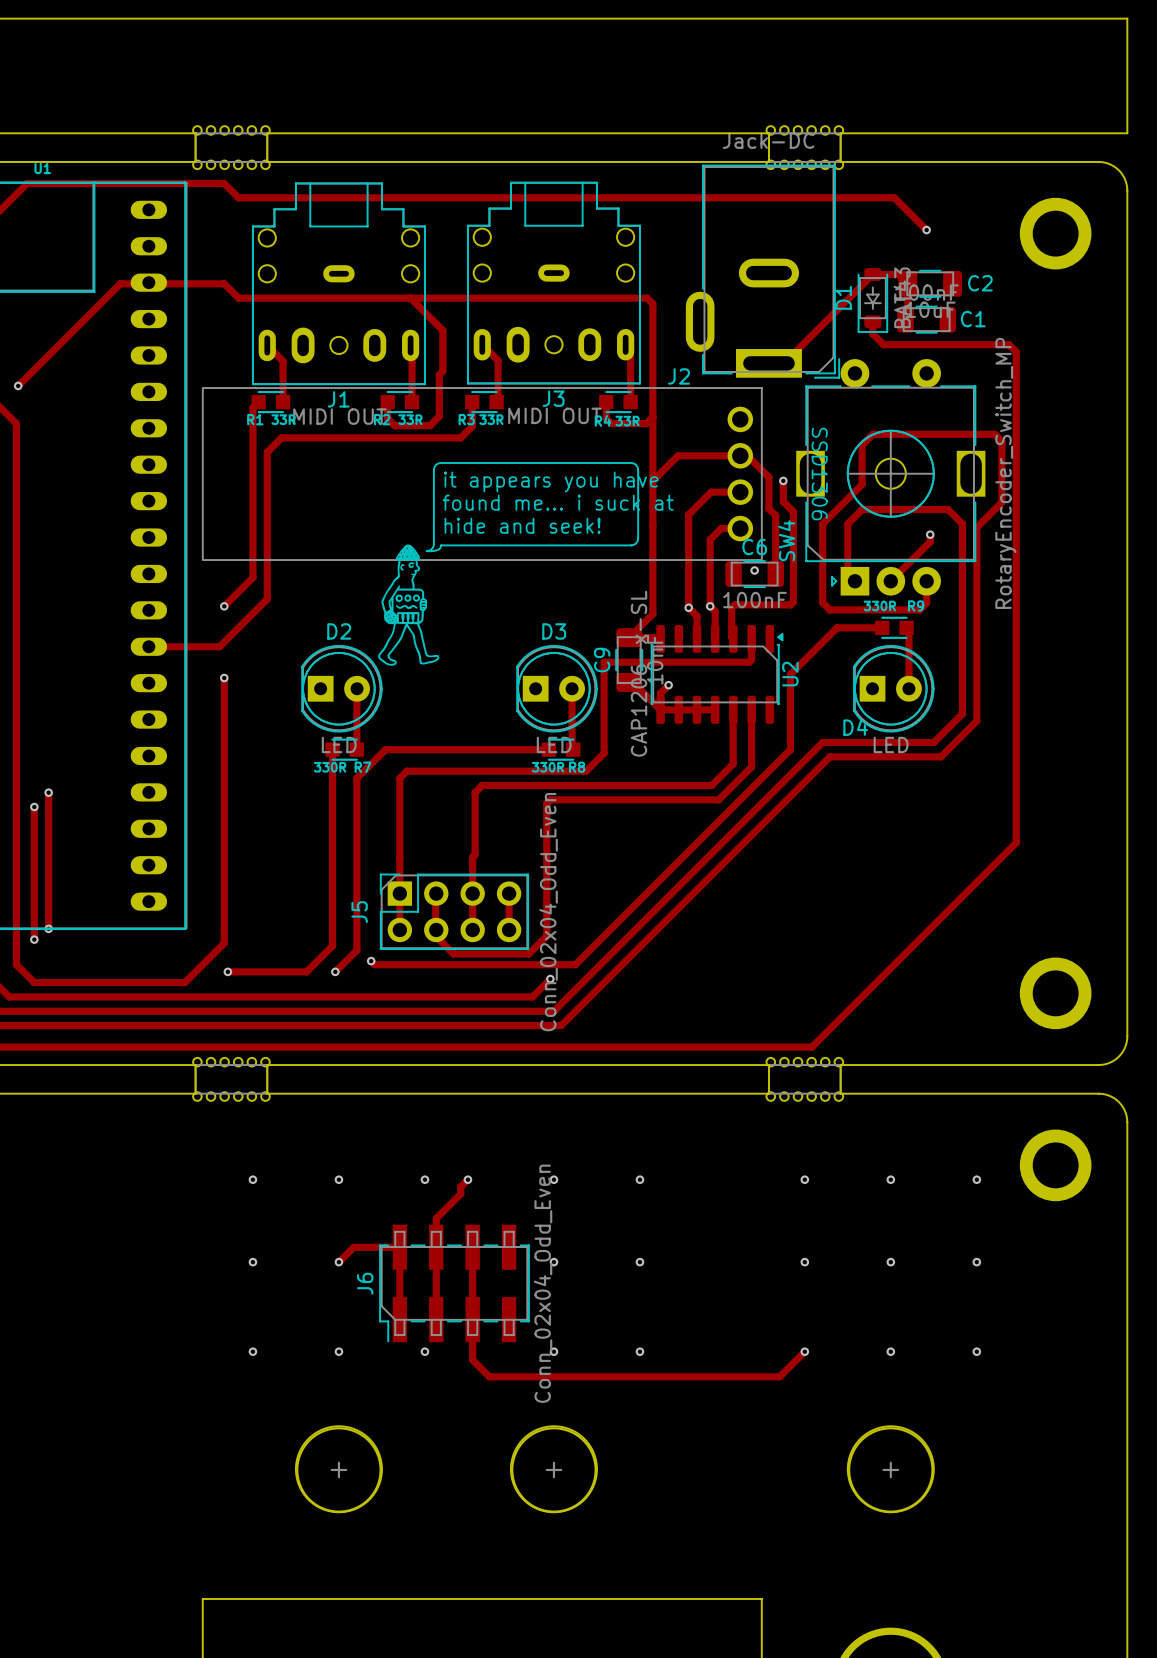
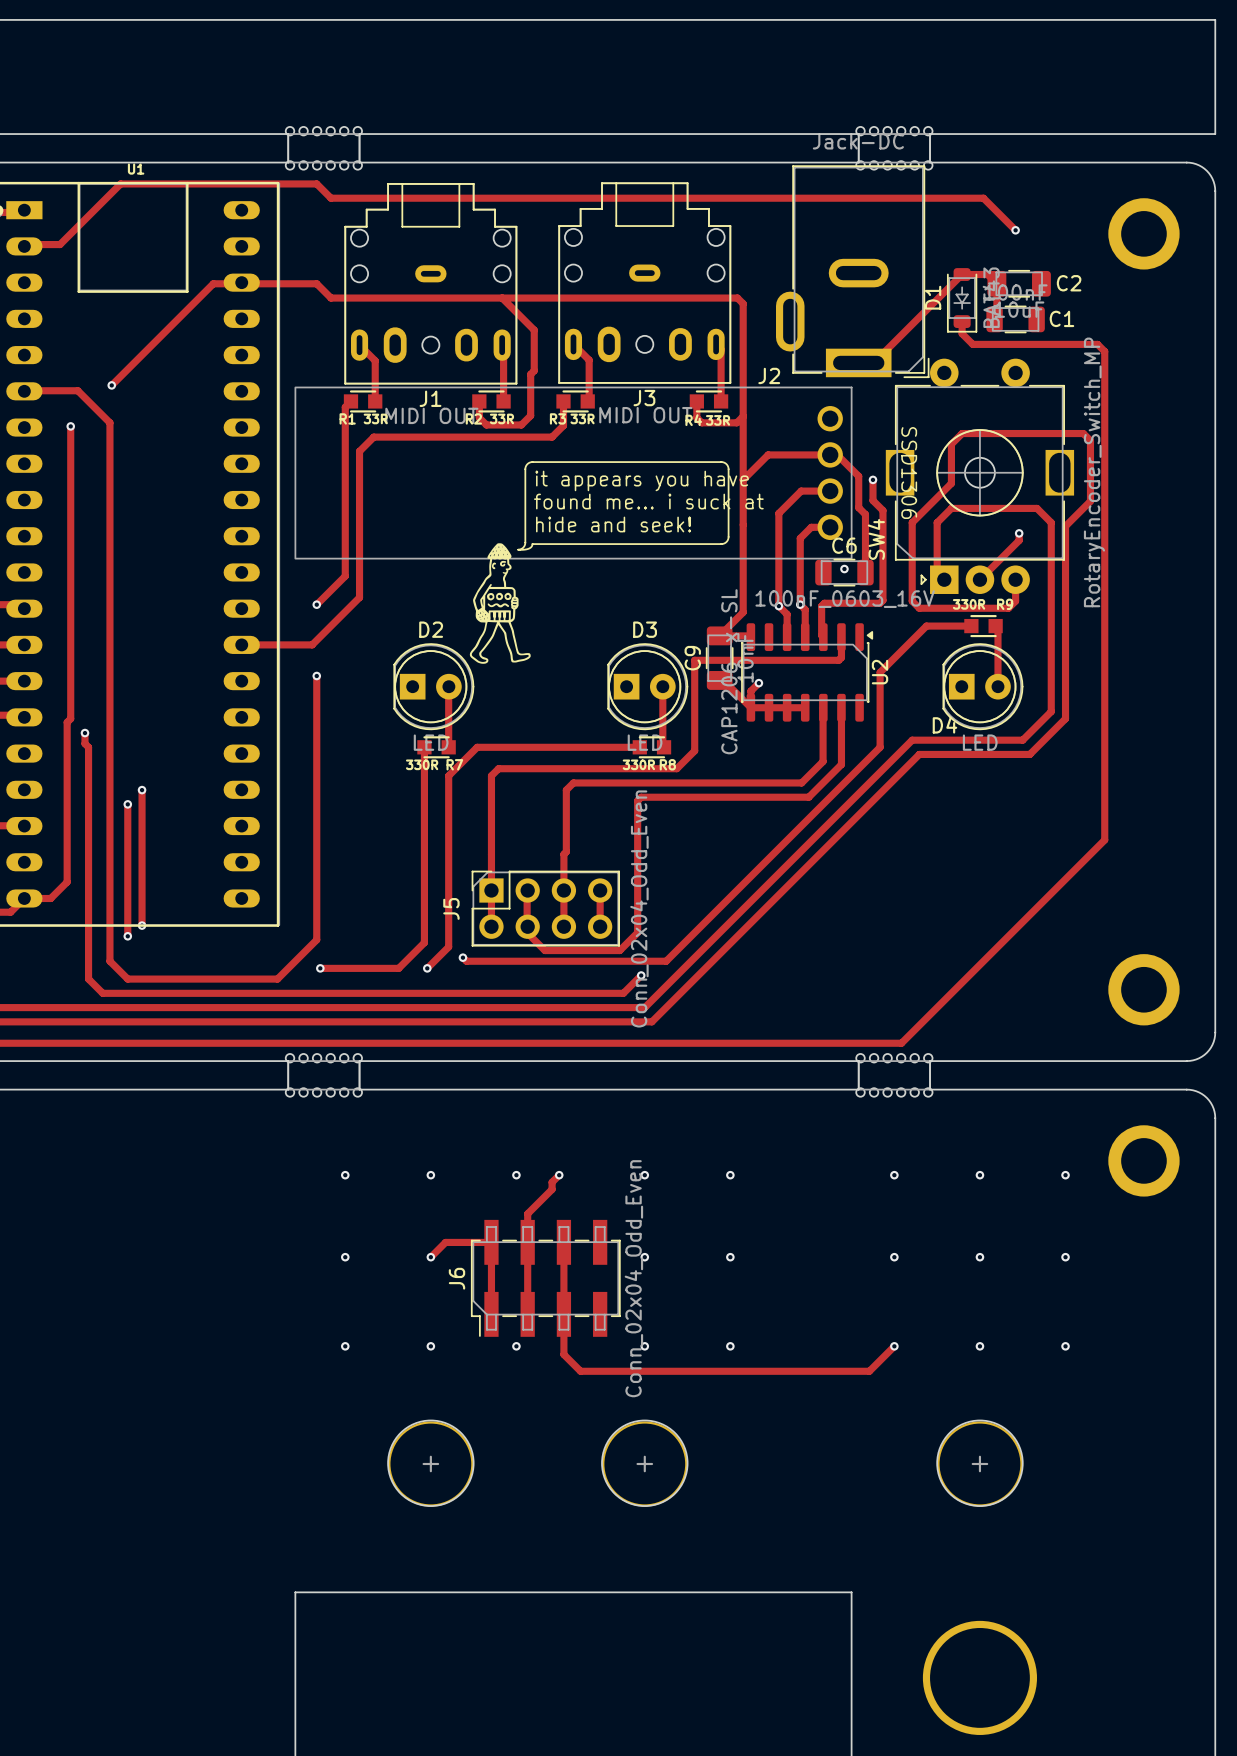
C6 value: 100nF (754, 600) -> 100nF_0603_16V (845, 599)

